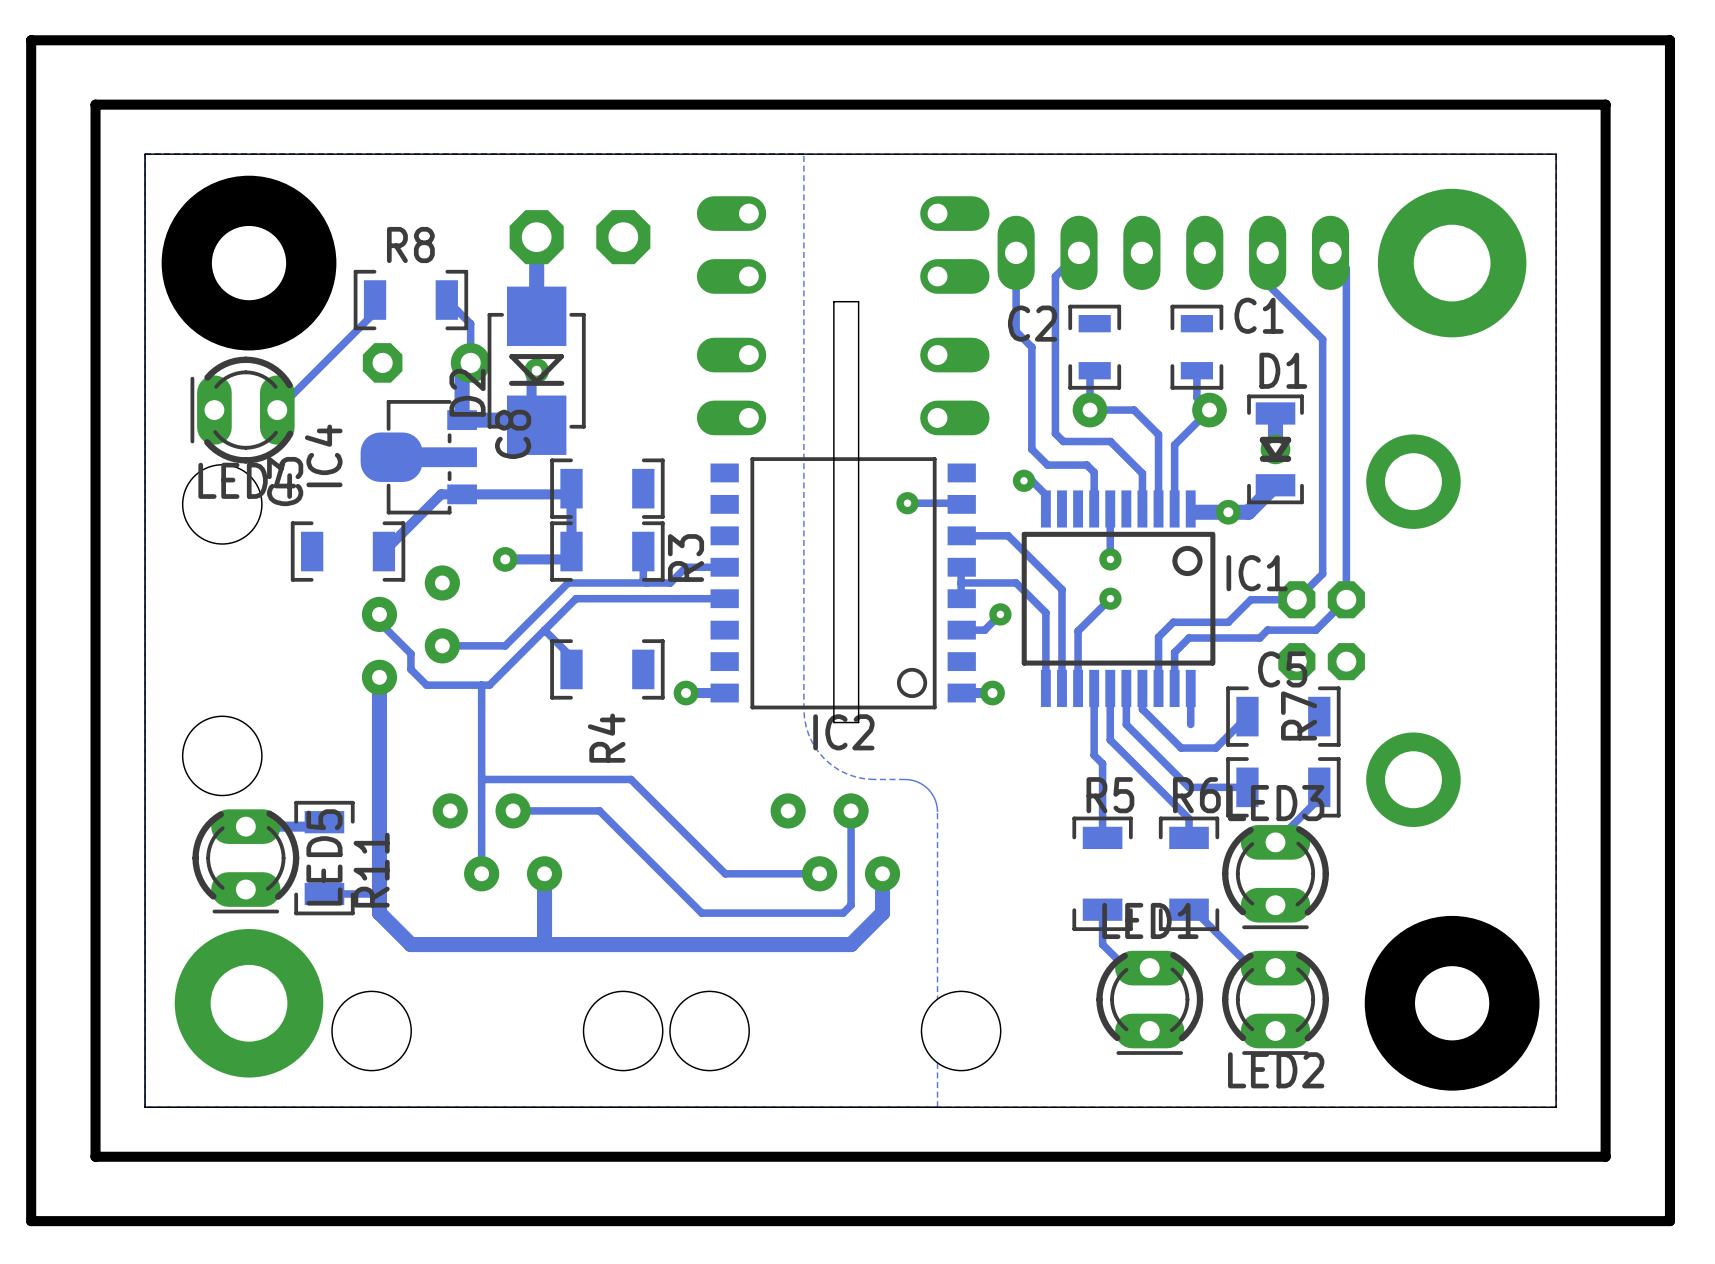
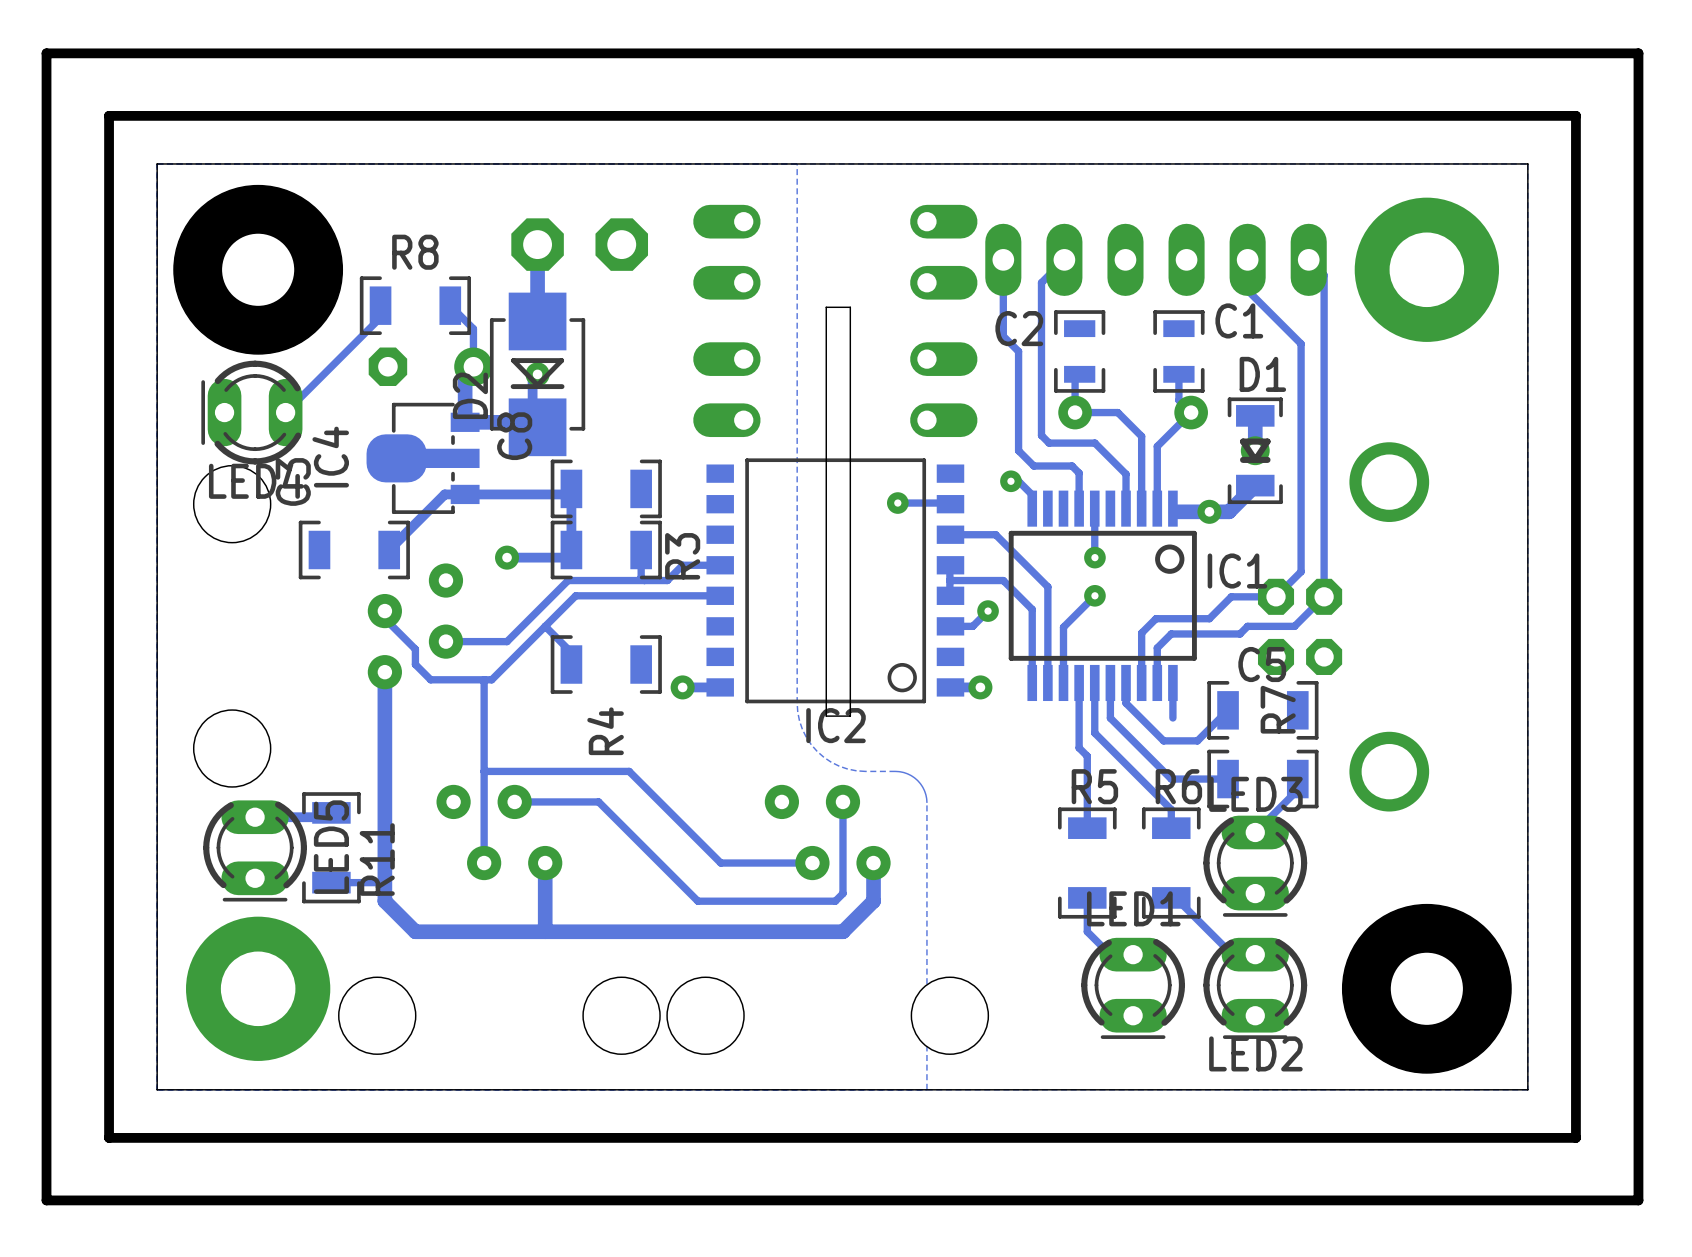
part footprint: [1278, 434, 1461, 827] -> [1257, 442, 1430, 812]

